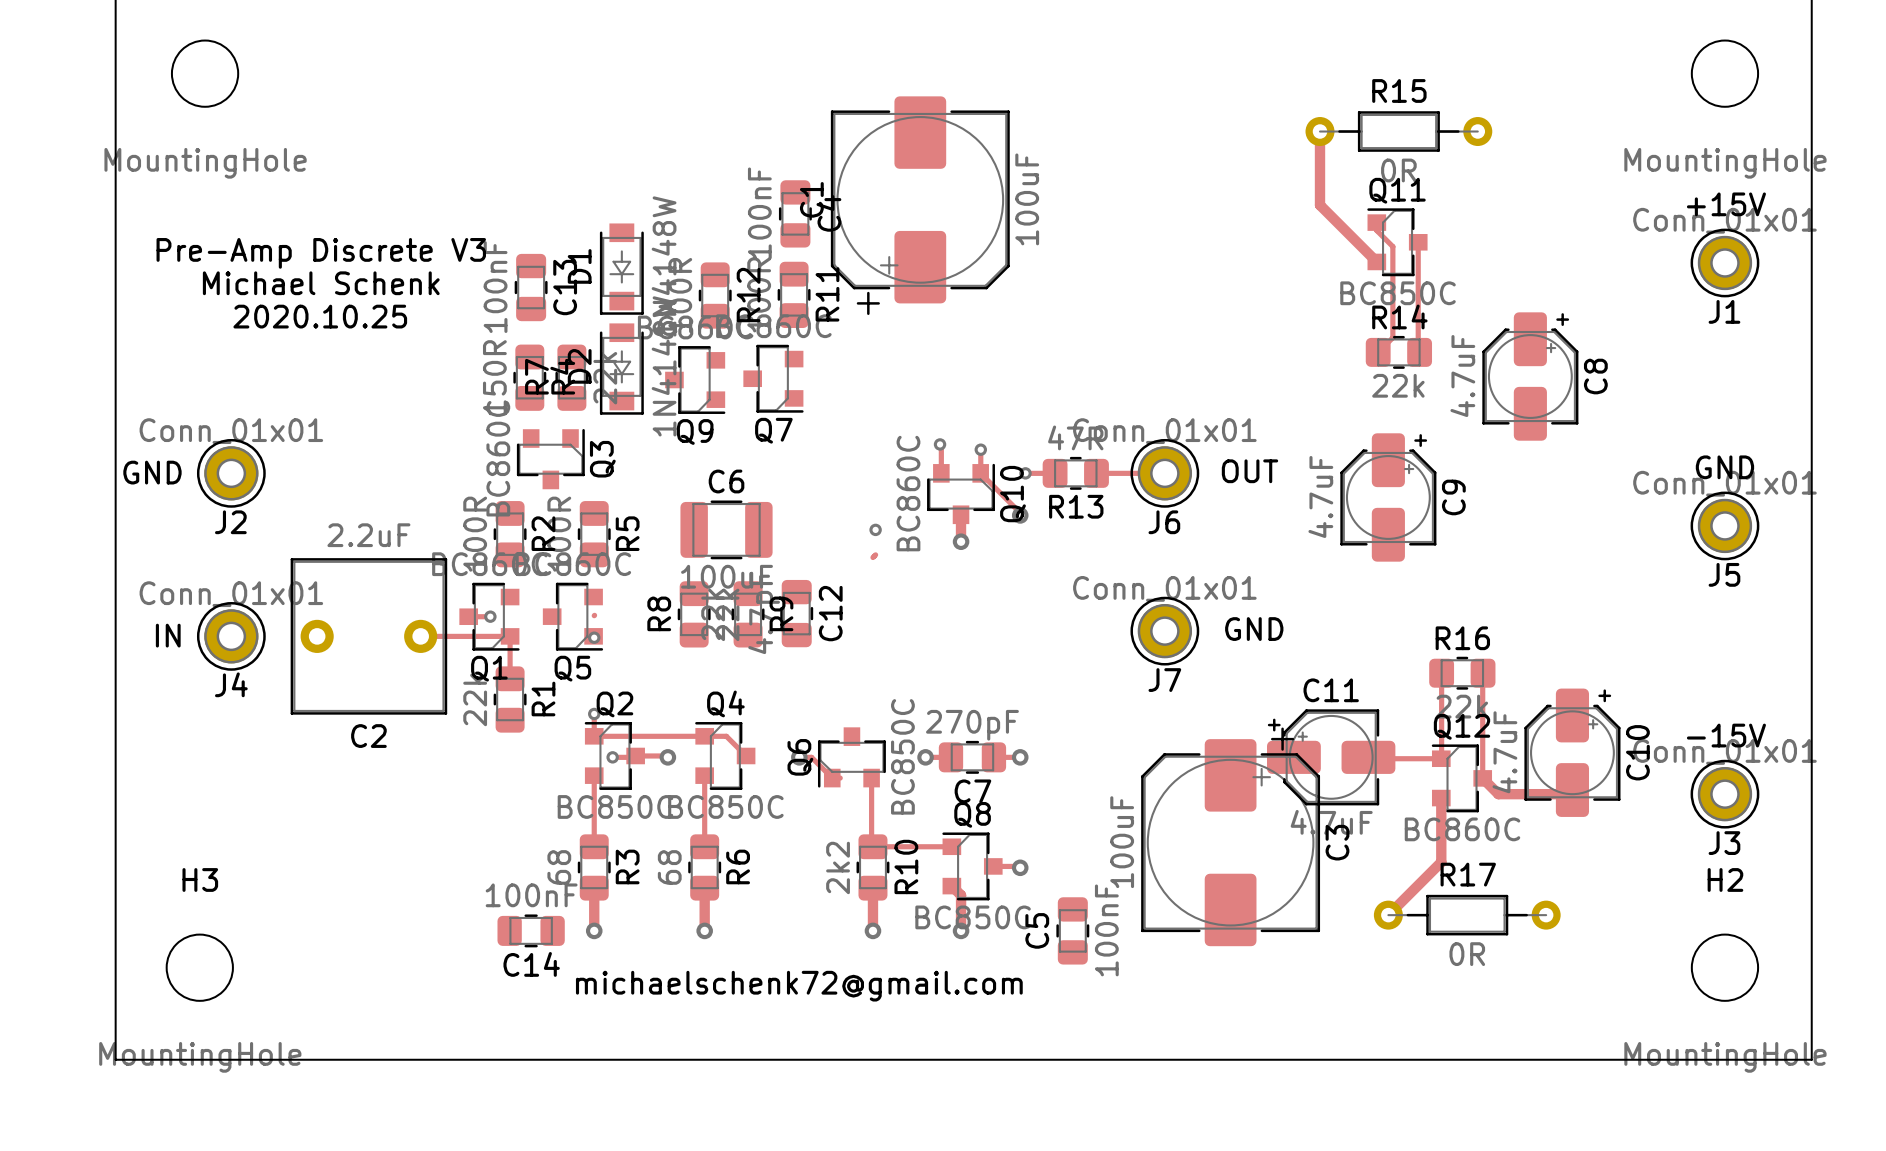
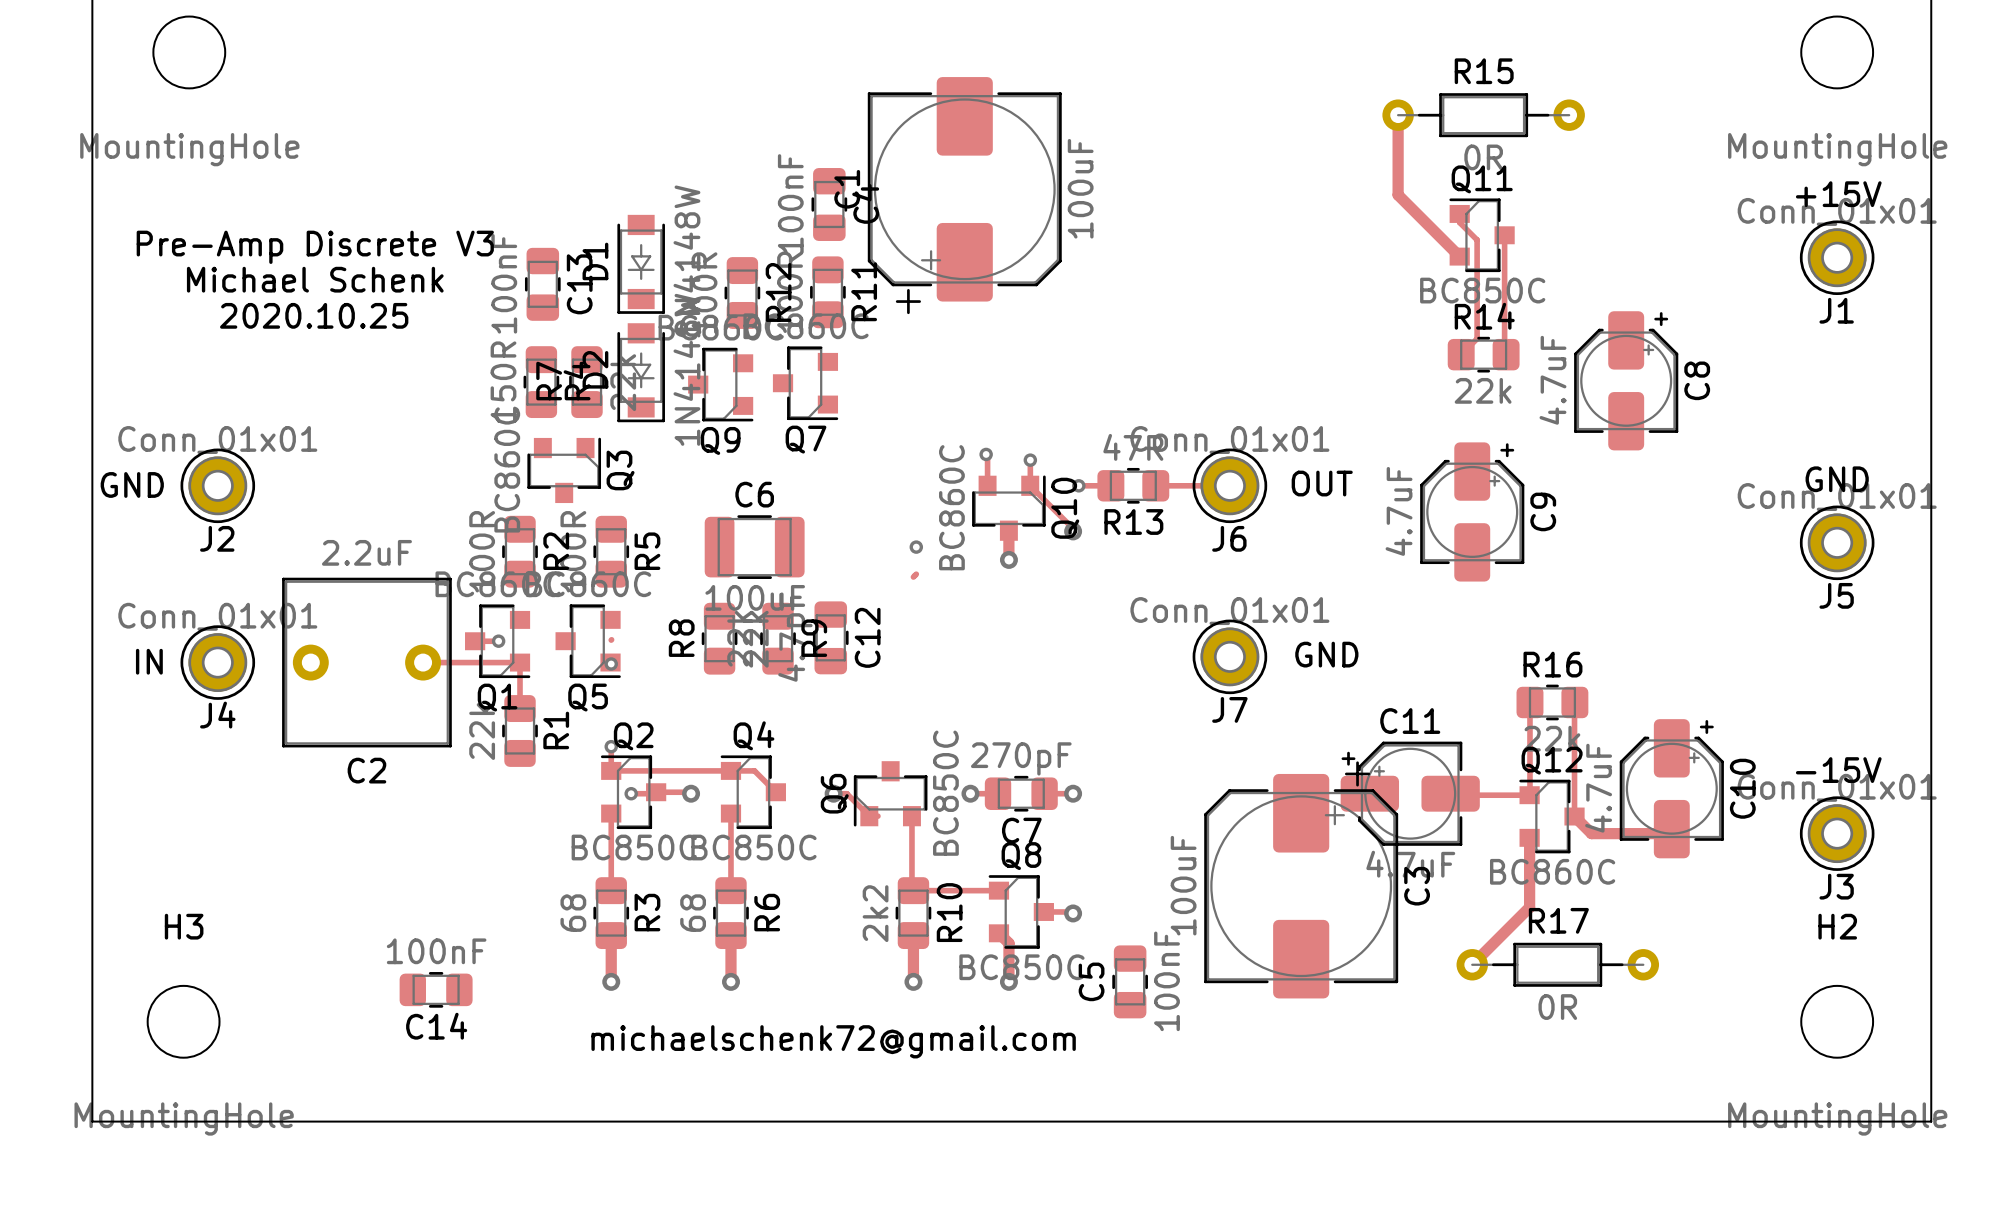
C14 position: (531, 930) -> (436, 989)

